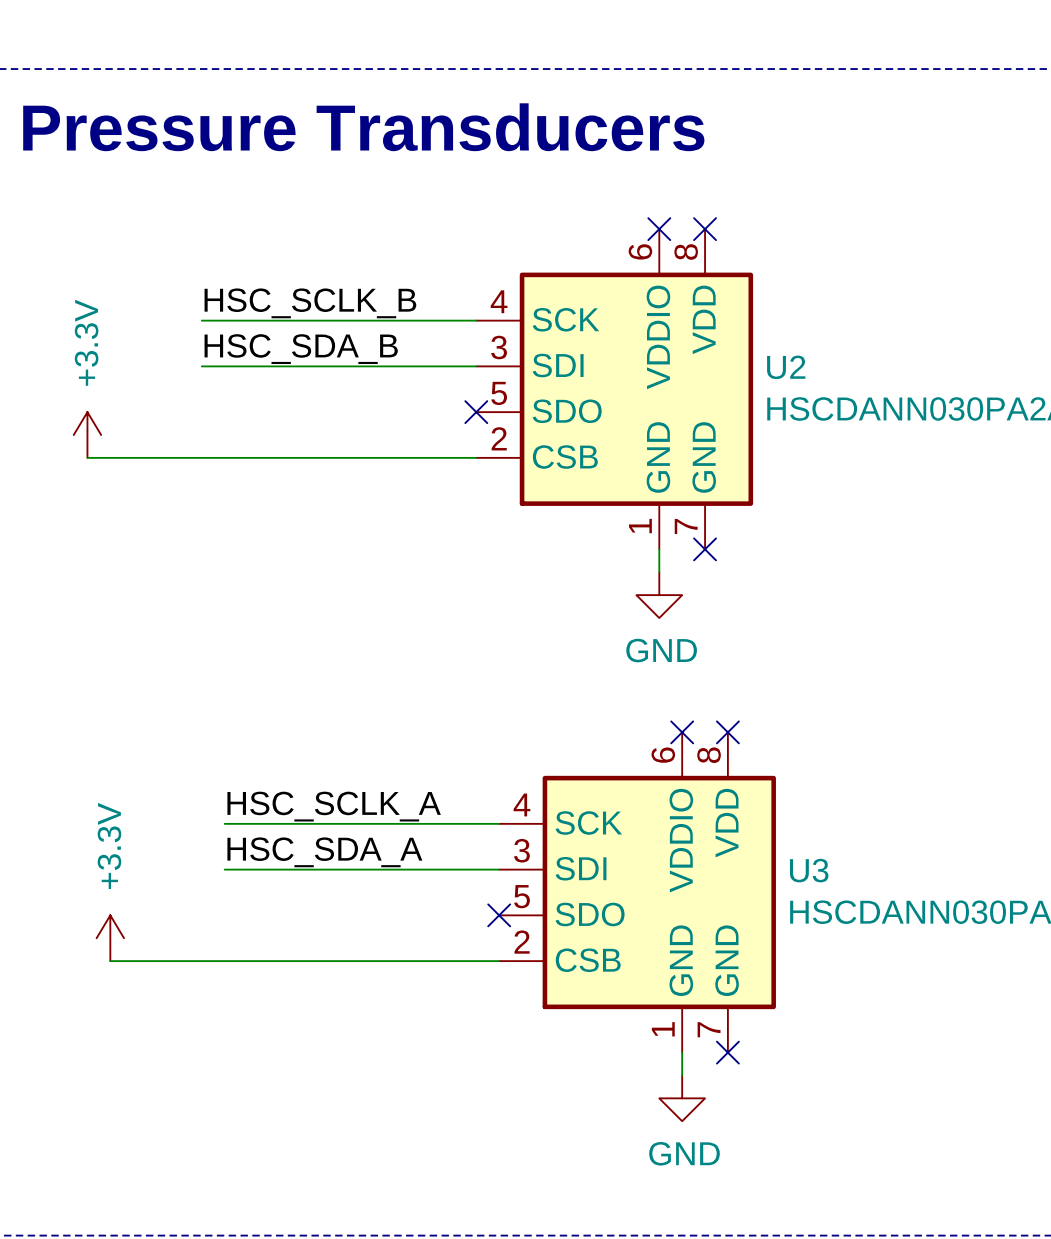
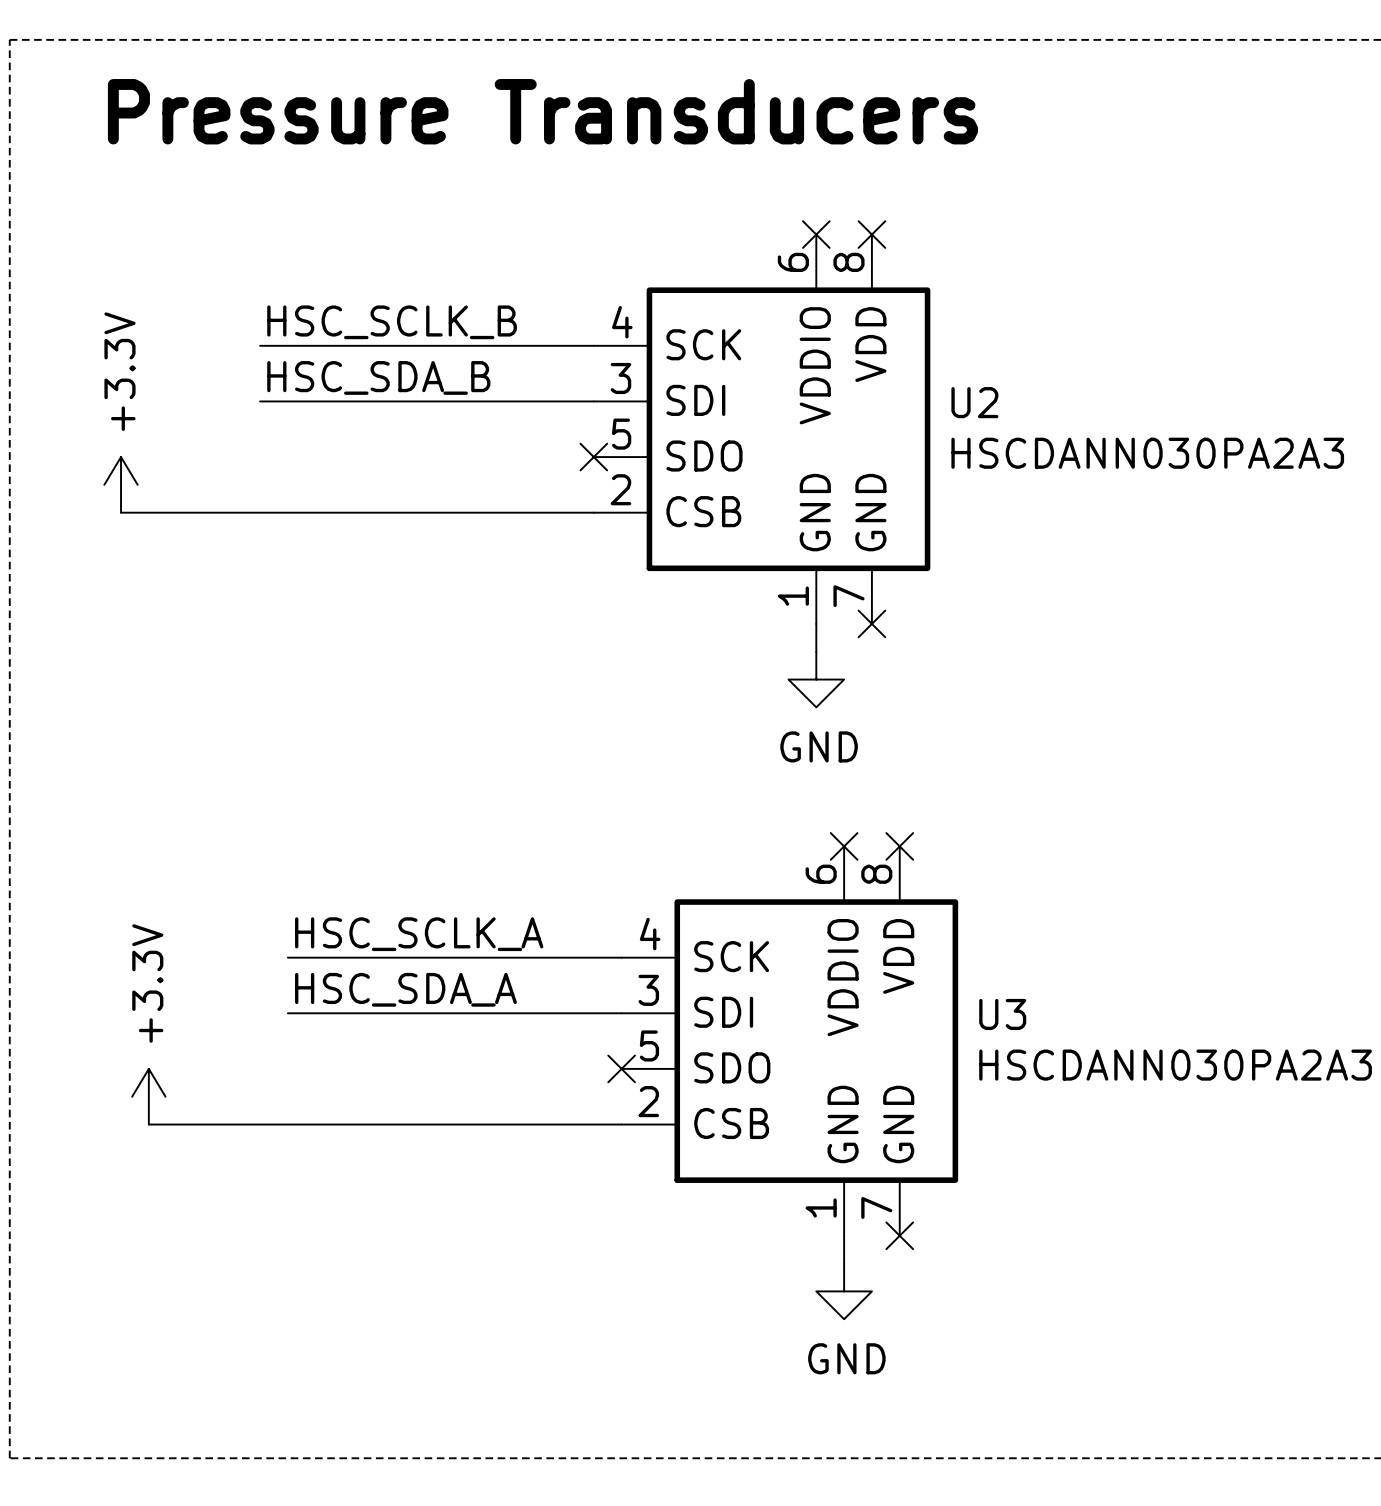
text position: Pressure Transducers (363, 127) -> Pressure Transducers (542, 111)

